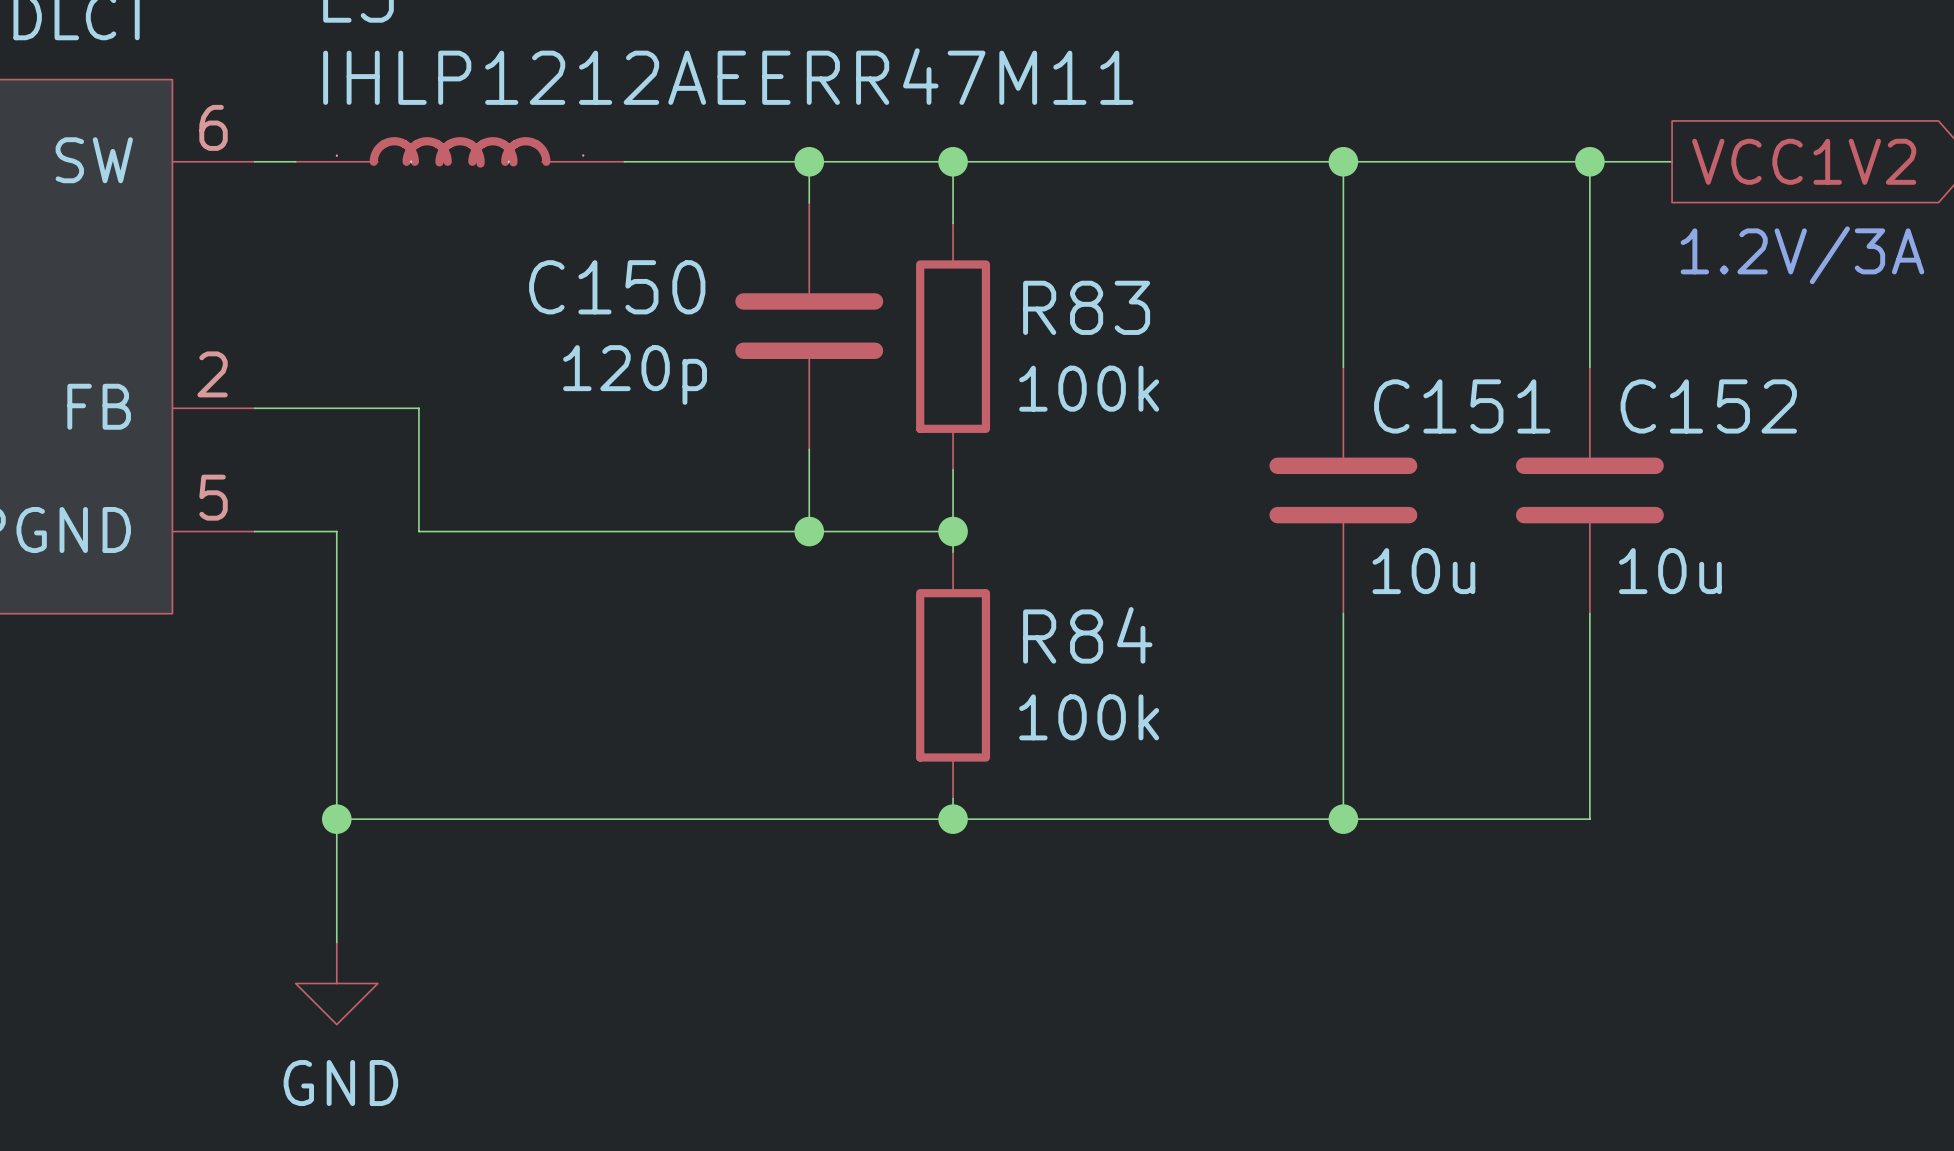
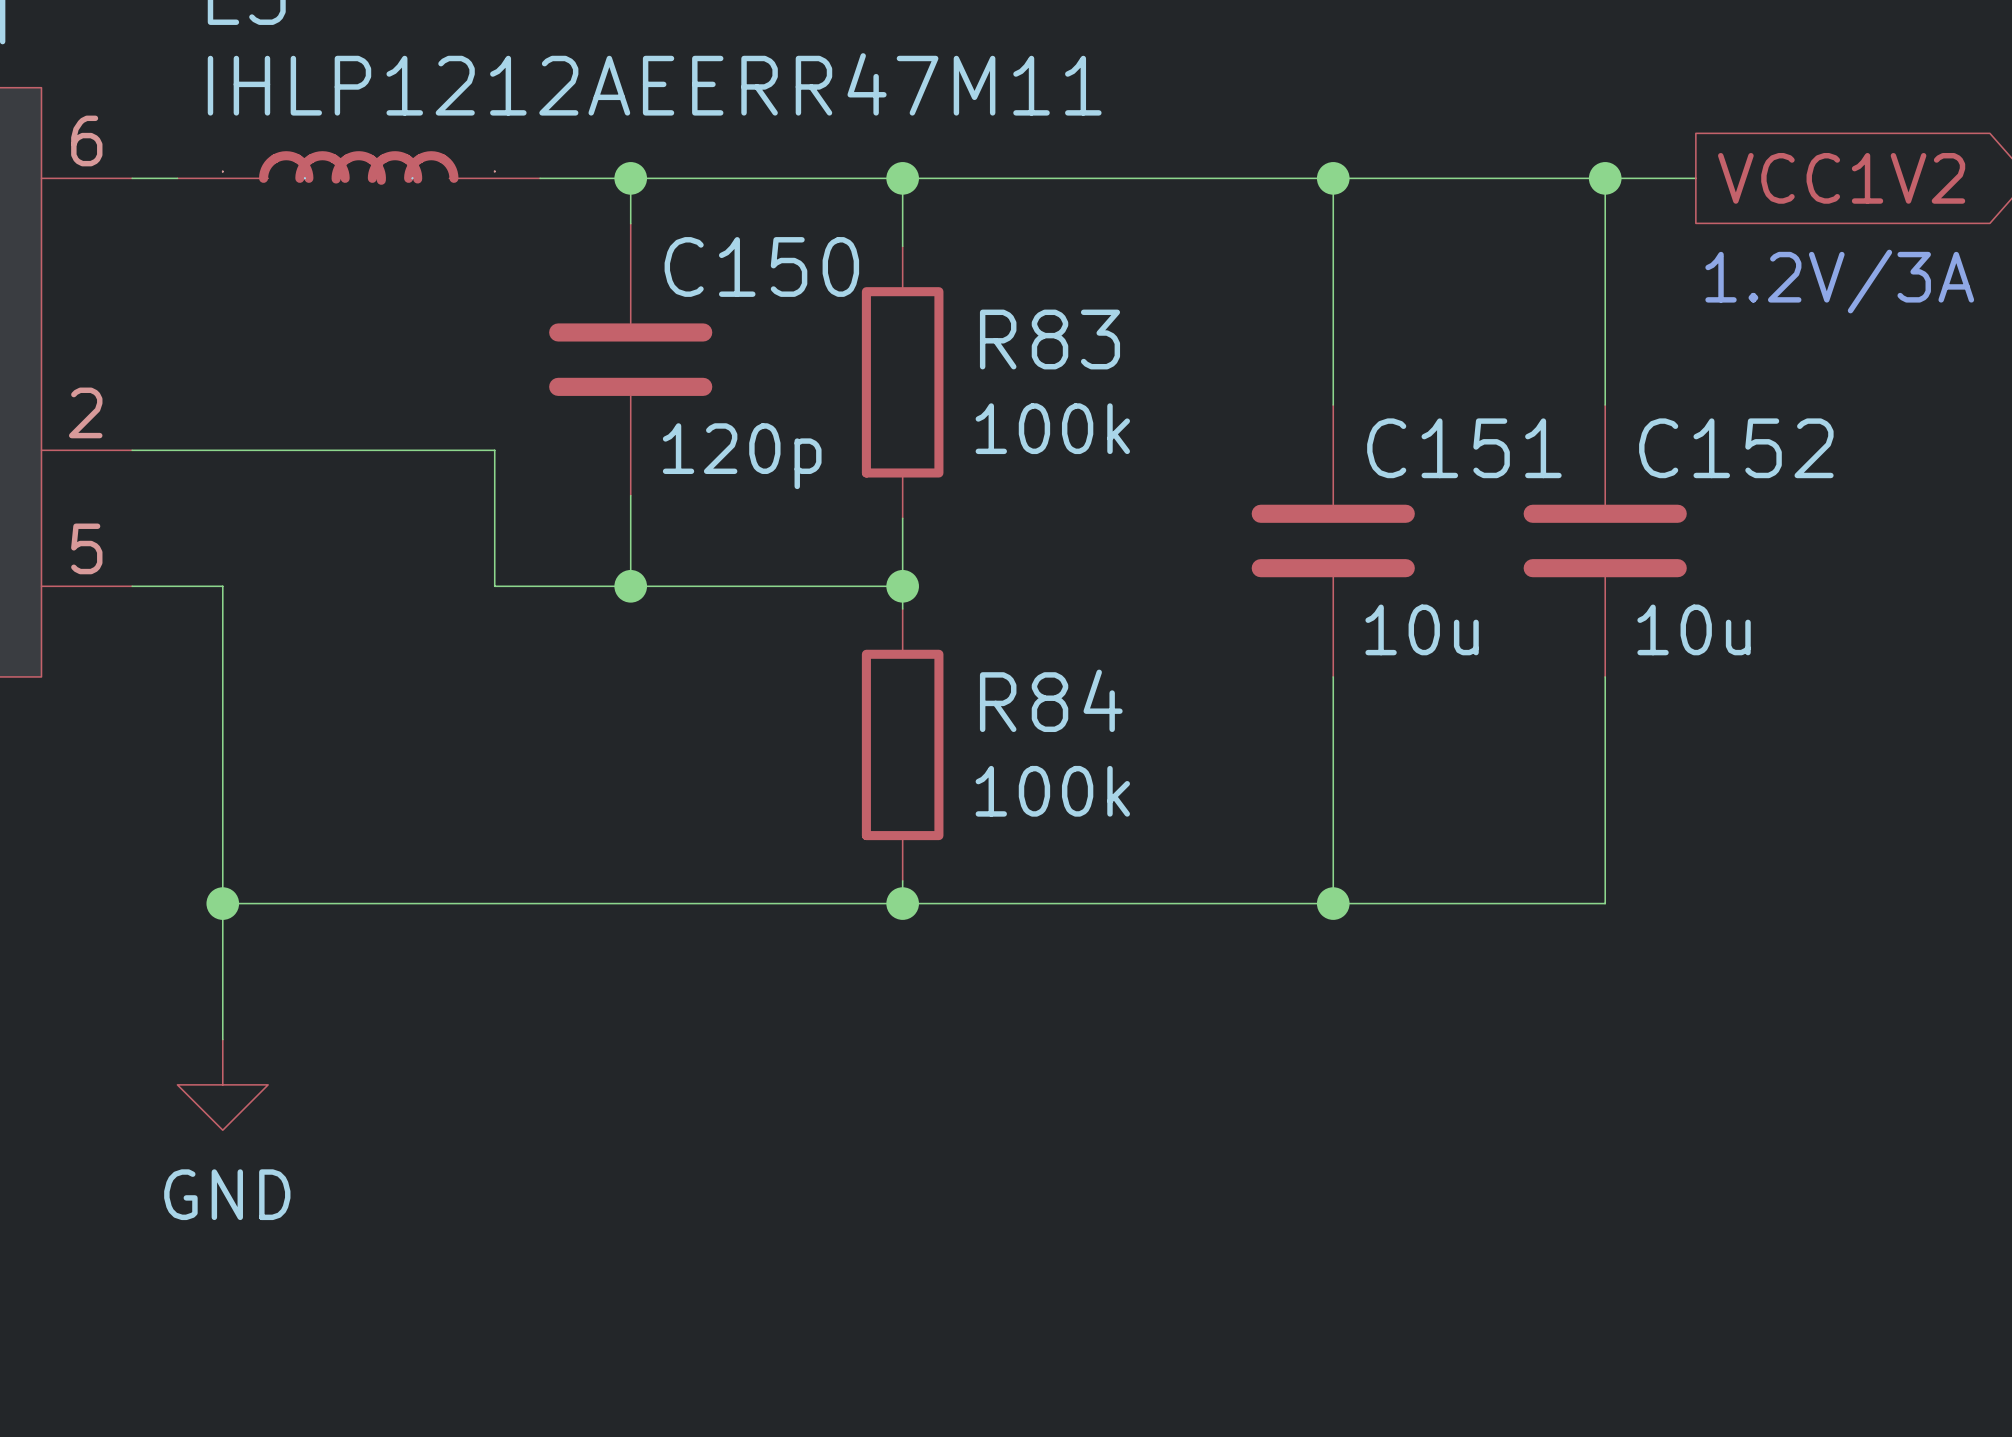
wire: (809, 161) (809, 202) -> (630, 178) (630, 223)
junction position: (809, 161) -> (630, 178)
C150 name position: C150 (617, 287) -> C150 (761, 266)
C150 position: (809, 326) -> (630, 359)
C150 text position: 120p (635, 374) -> 120p (742, 456)
wire: (418, 408) (418, 531) (583, 531) -> (313, 450) (494, 450) (494, 586)
wire: (809, 449) (809, 531) -> (630, 495) (630, 586)
junction position: (809, 531) -> (630, 586)

